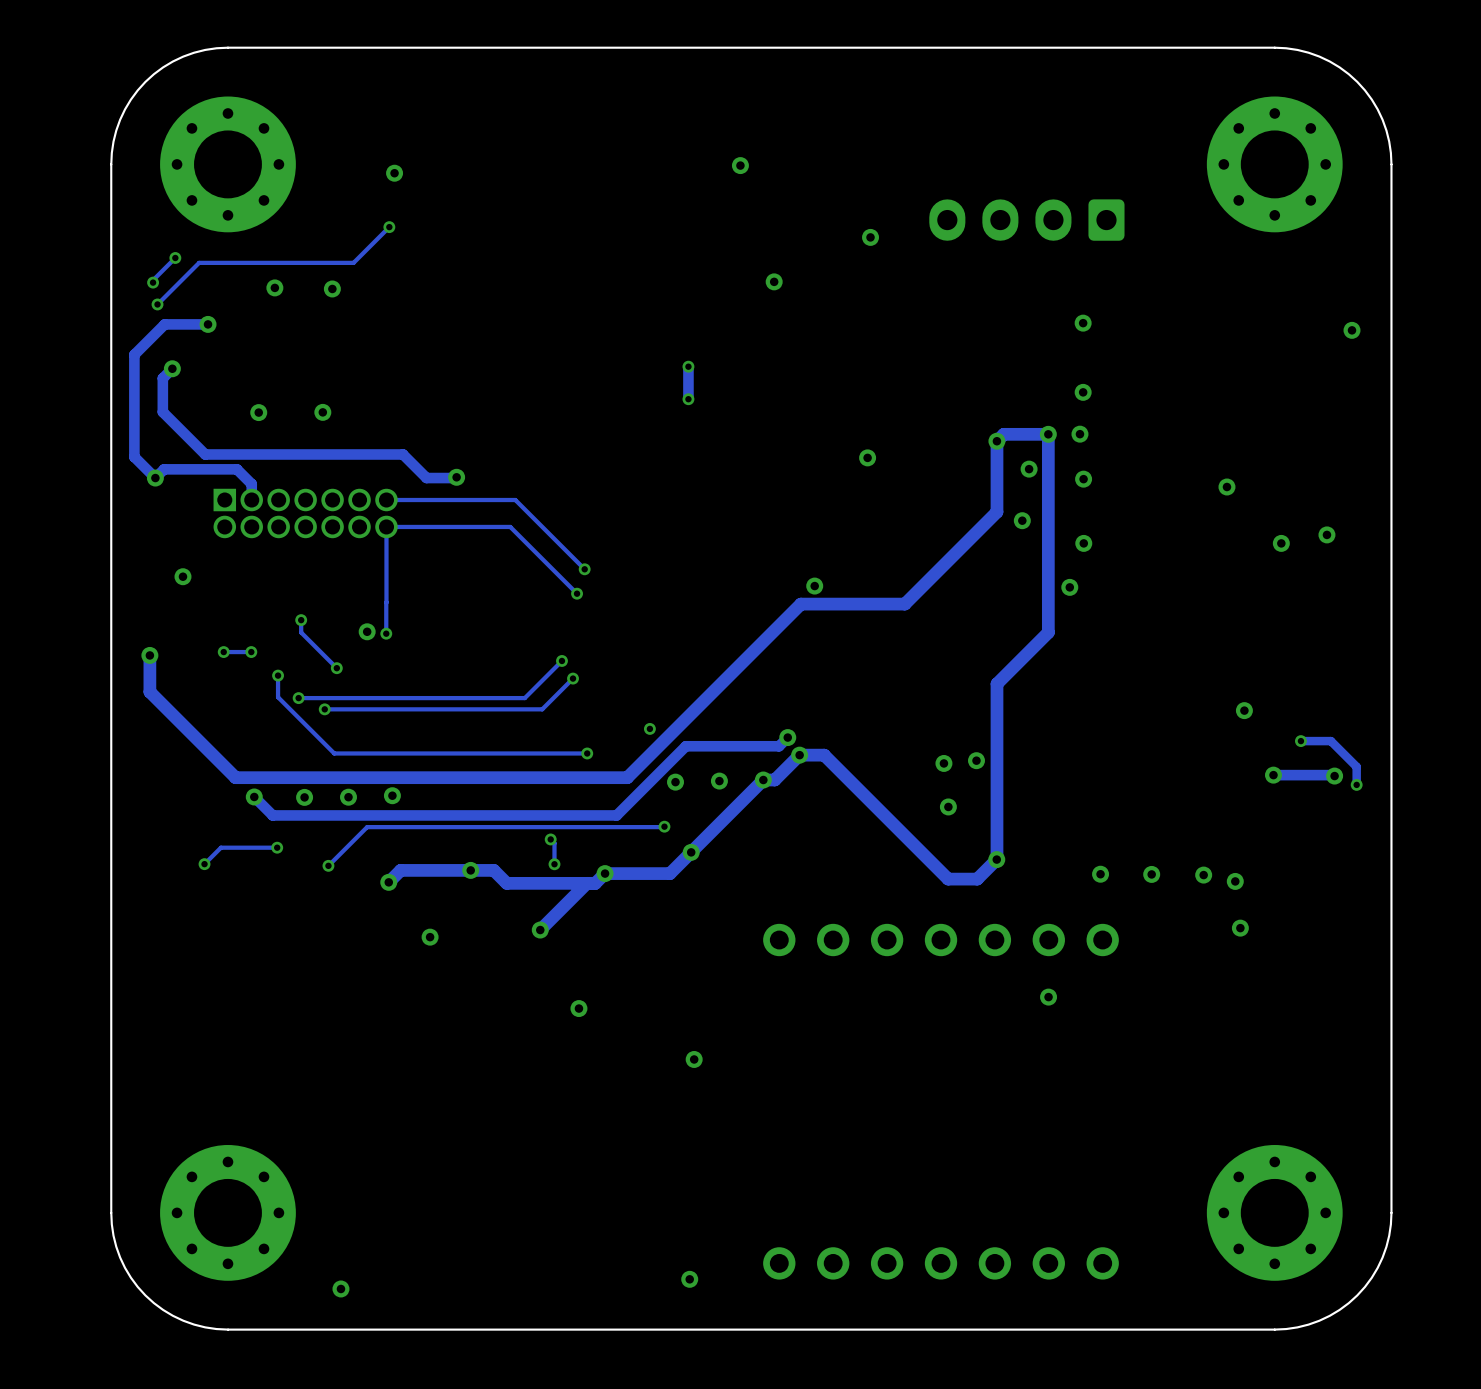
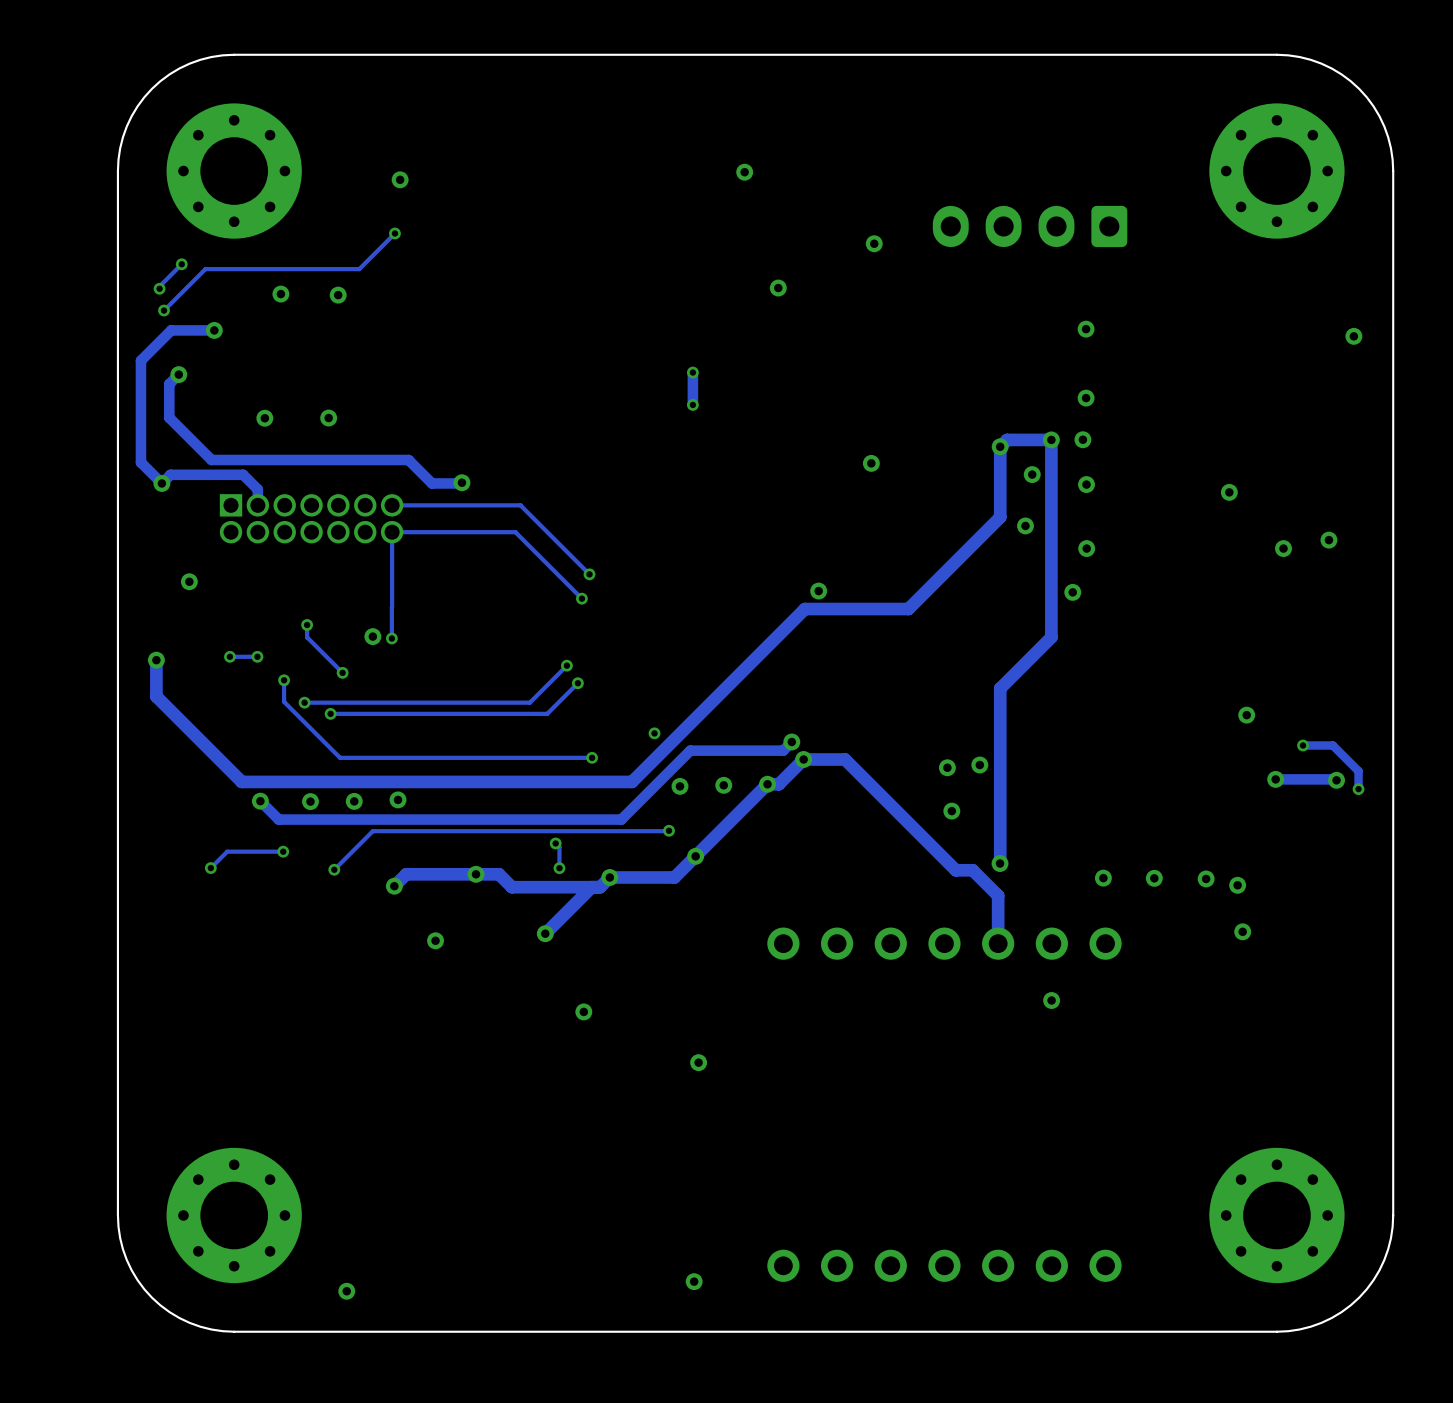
track: (824, 755) (948, 879) (977, 879) (996, 859) -> (828, 759) (845, 759) (955, 870) (972, 870) (998, 895) (998, 943)

